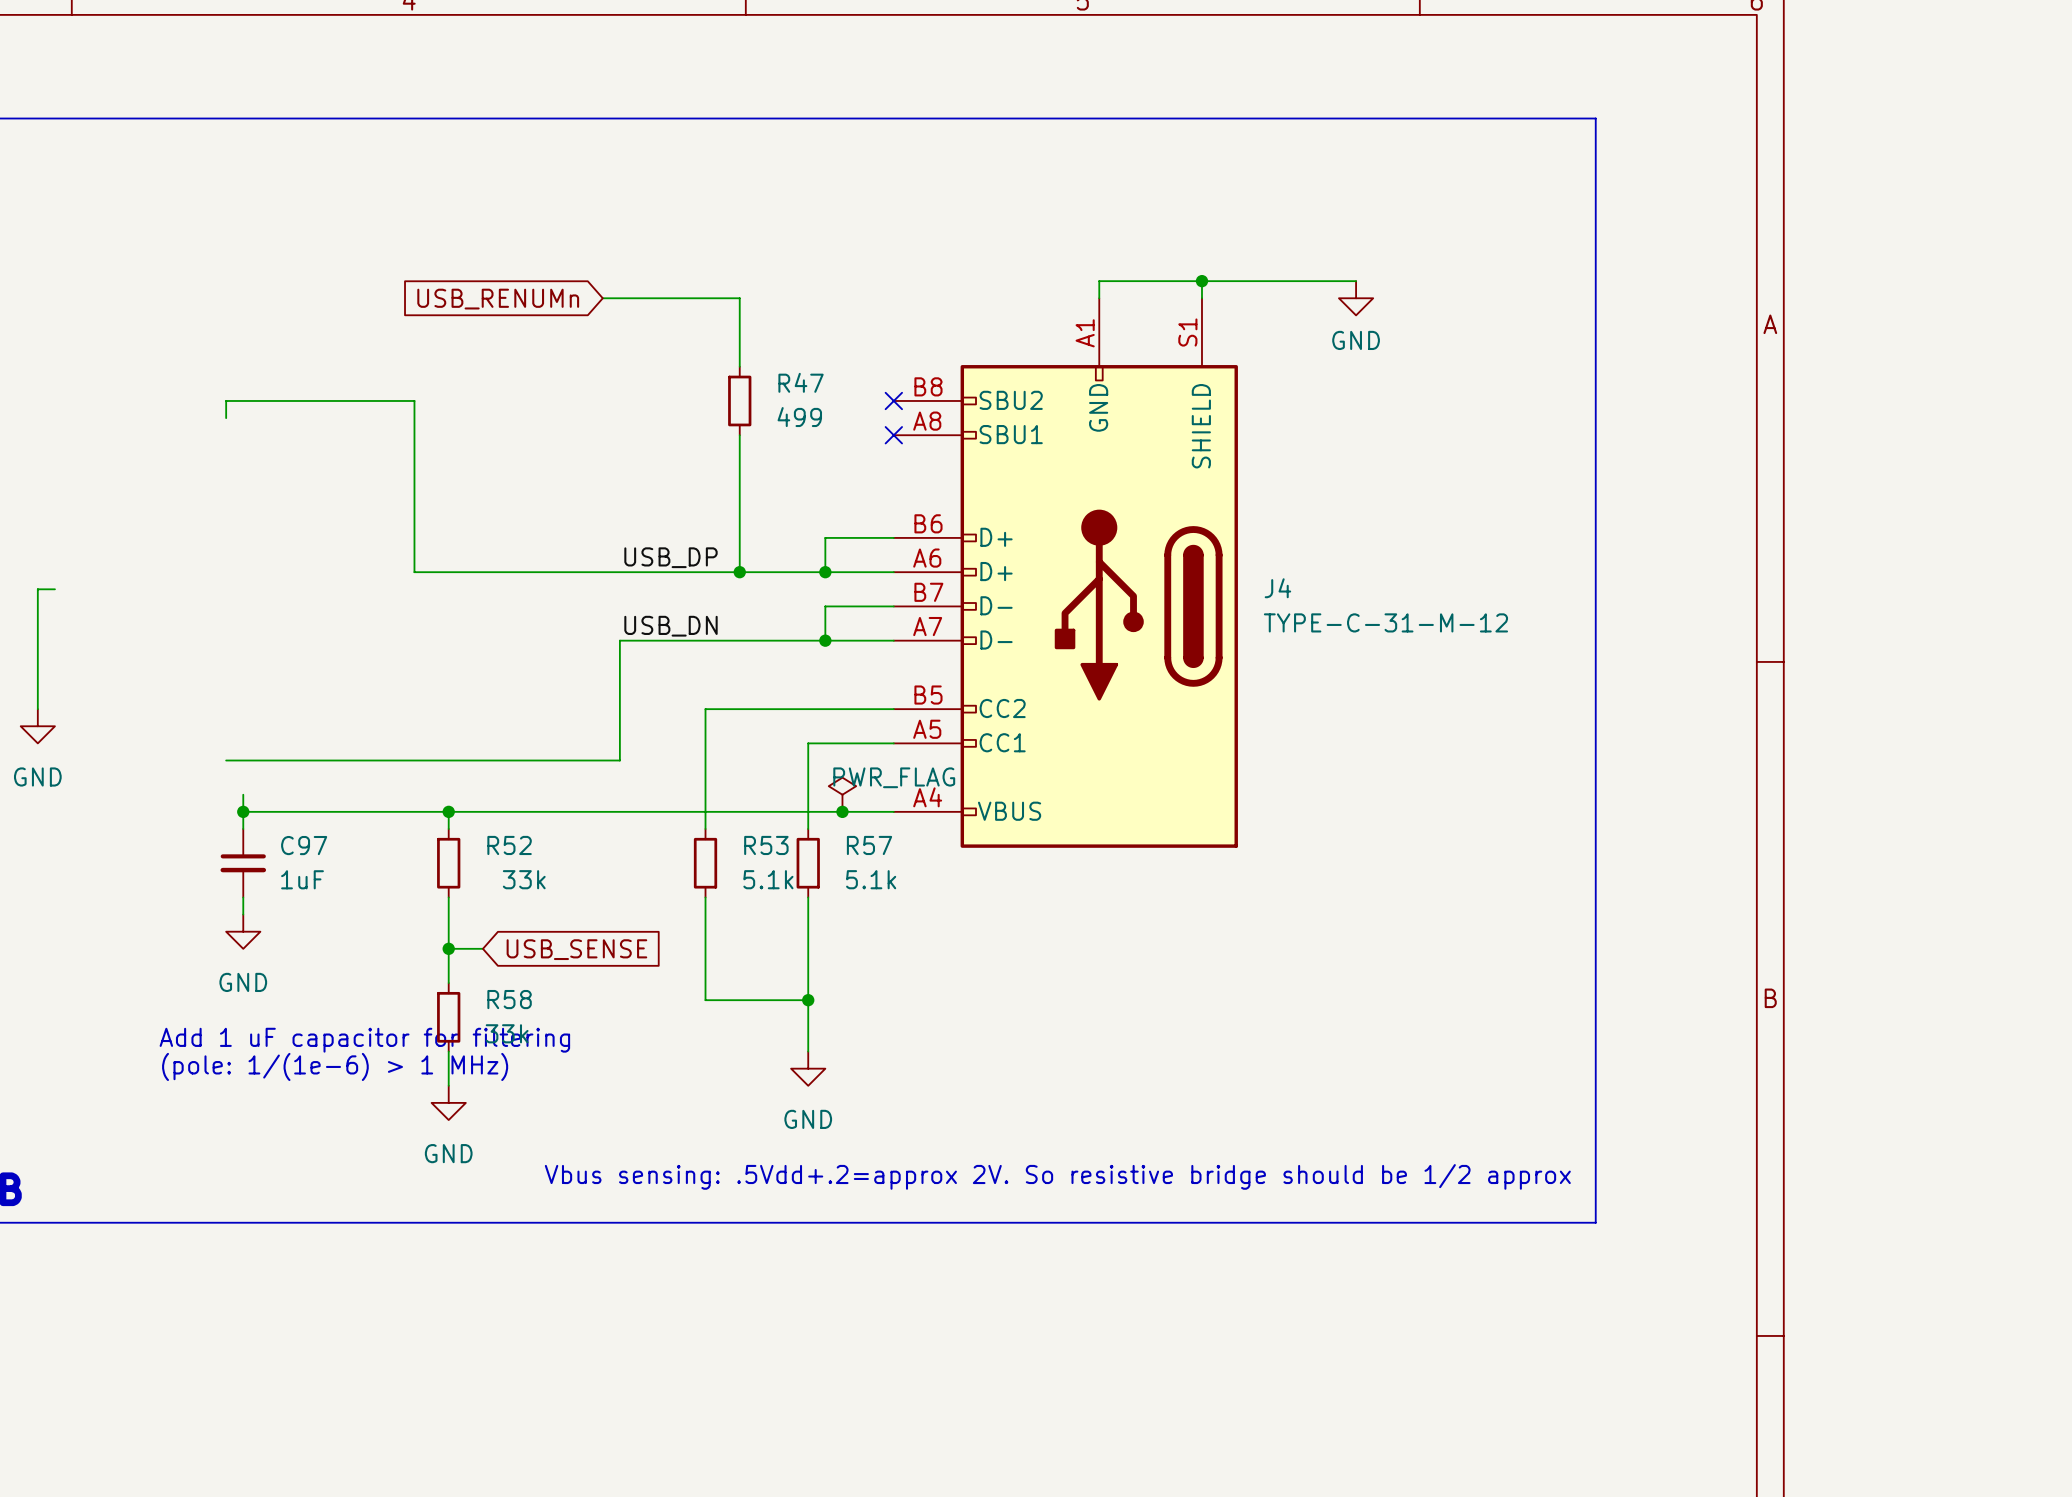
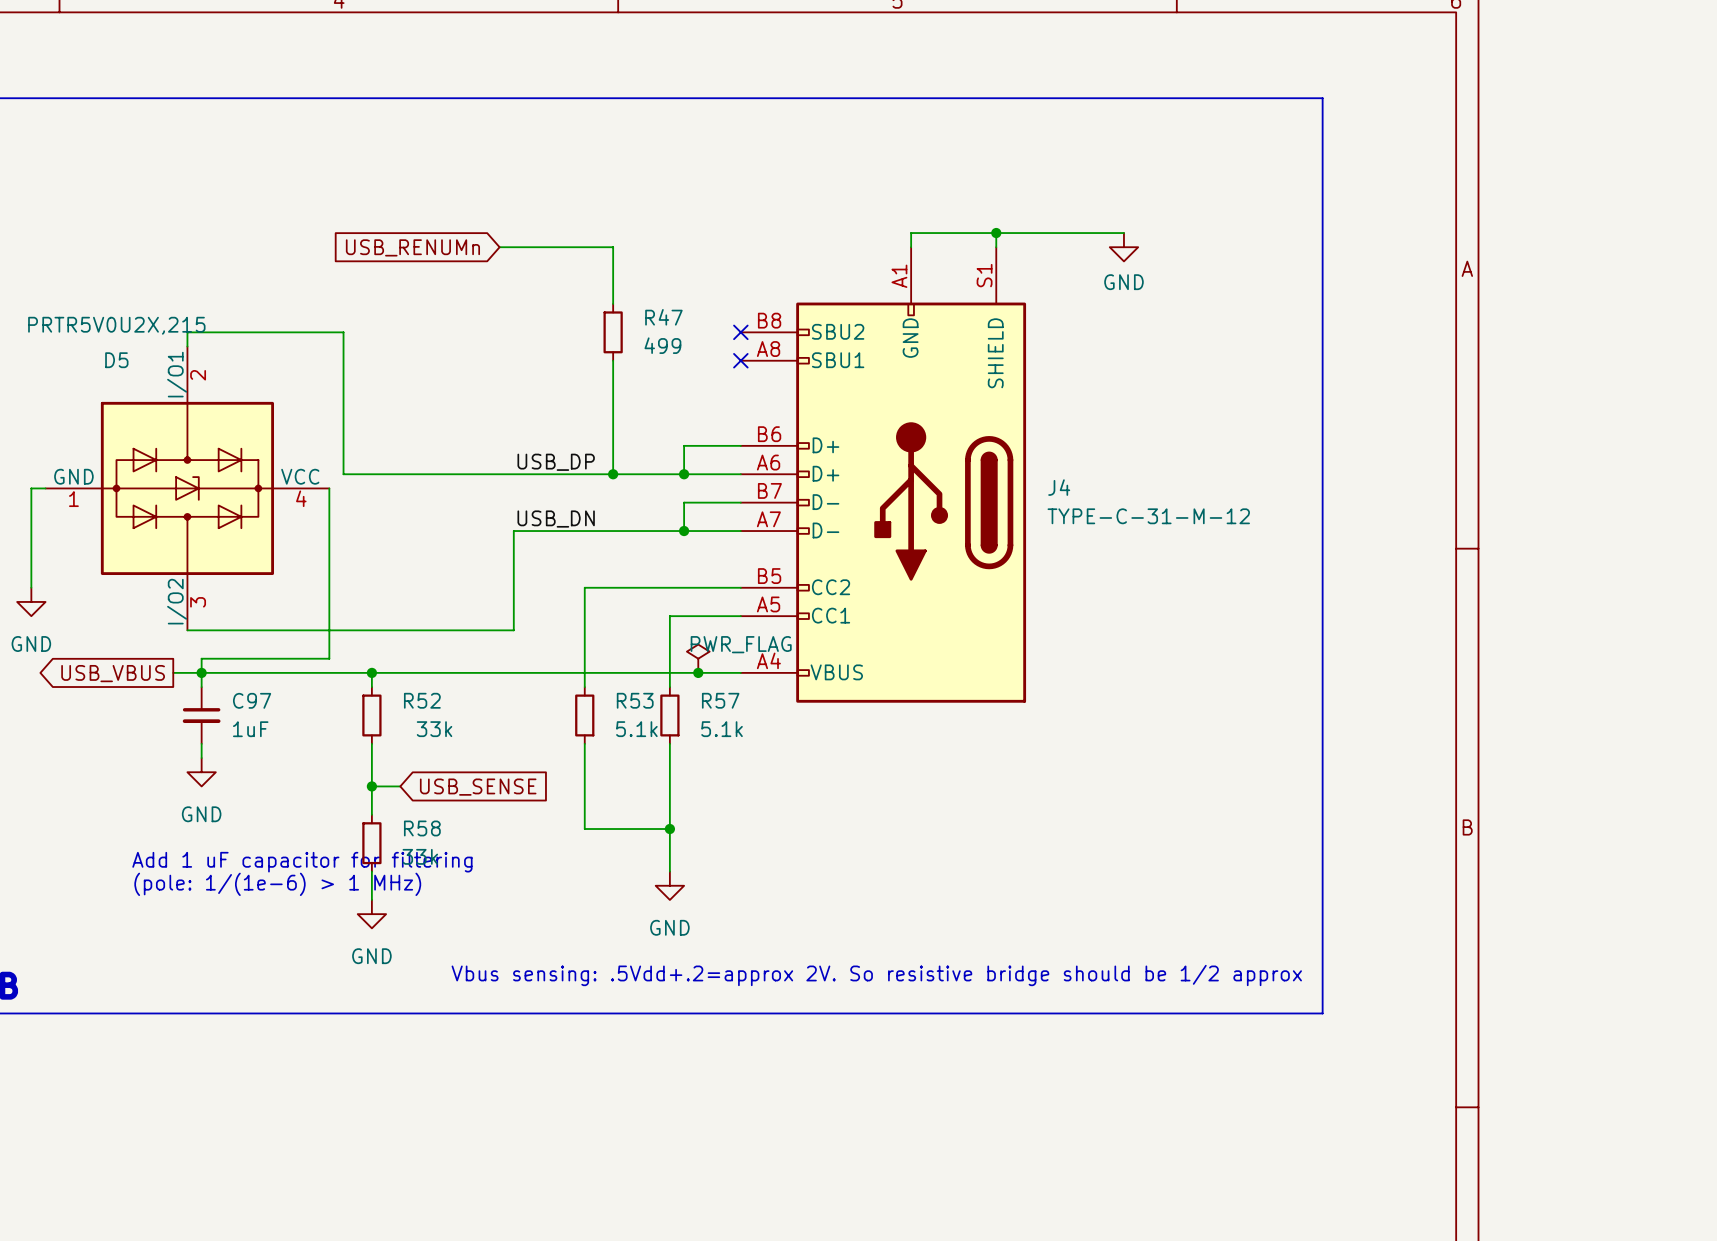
D5: none -> PRTR5V0U2X,215 (187, 488)
wire: none -> (329, 488) (329, 658) (201, 658)
wire: none -> (173, 672) (201, 672)
global label: none -> USB_VBUS (113, 673)

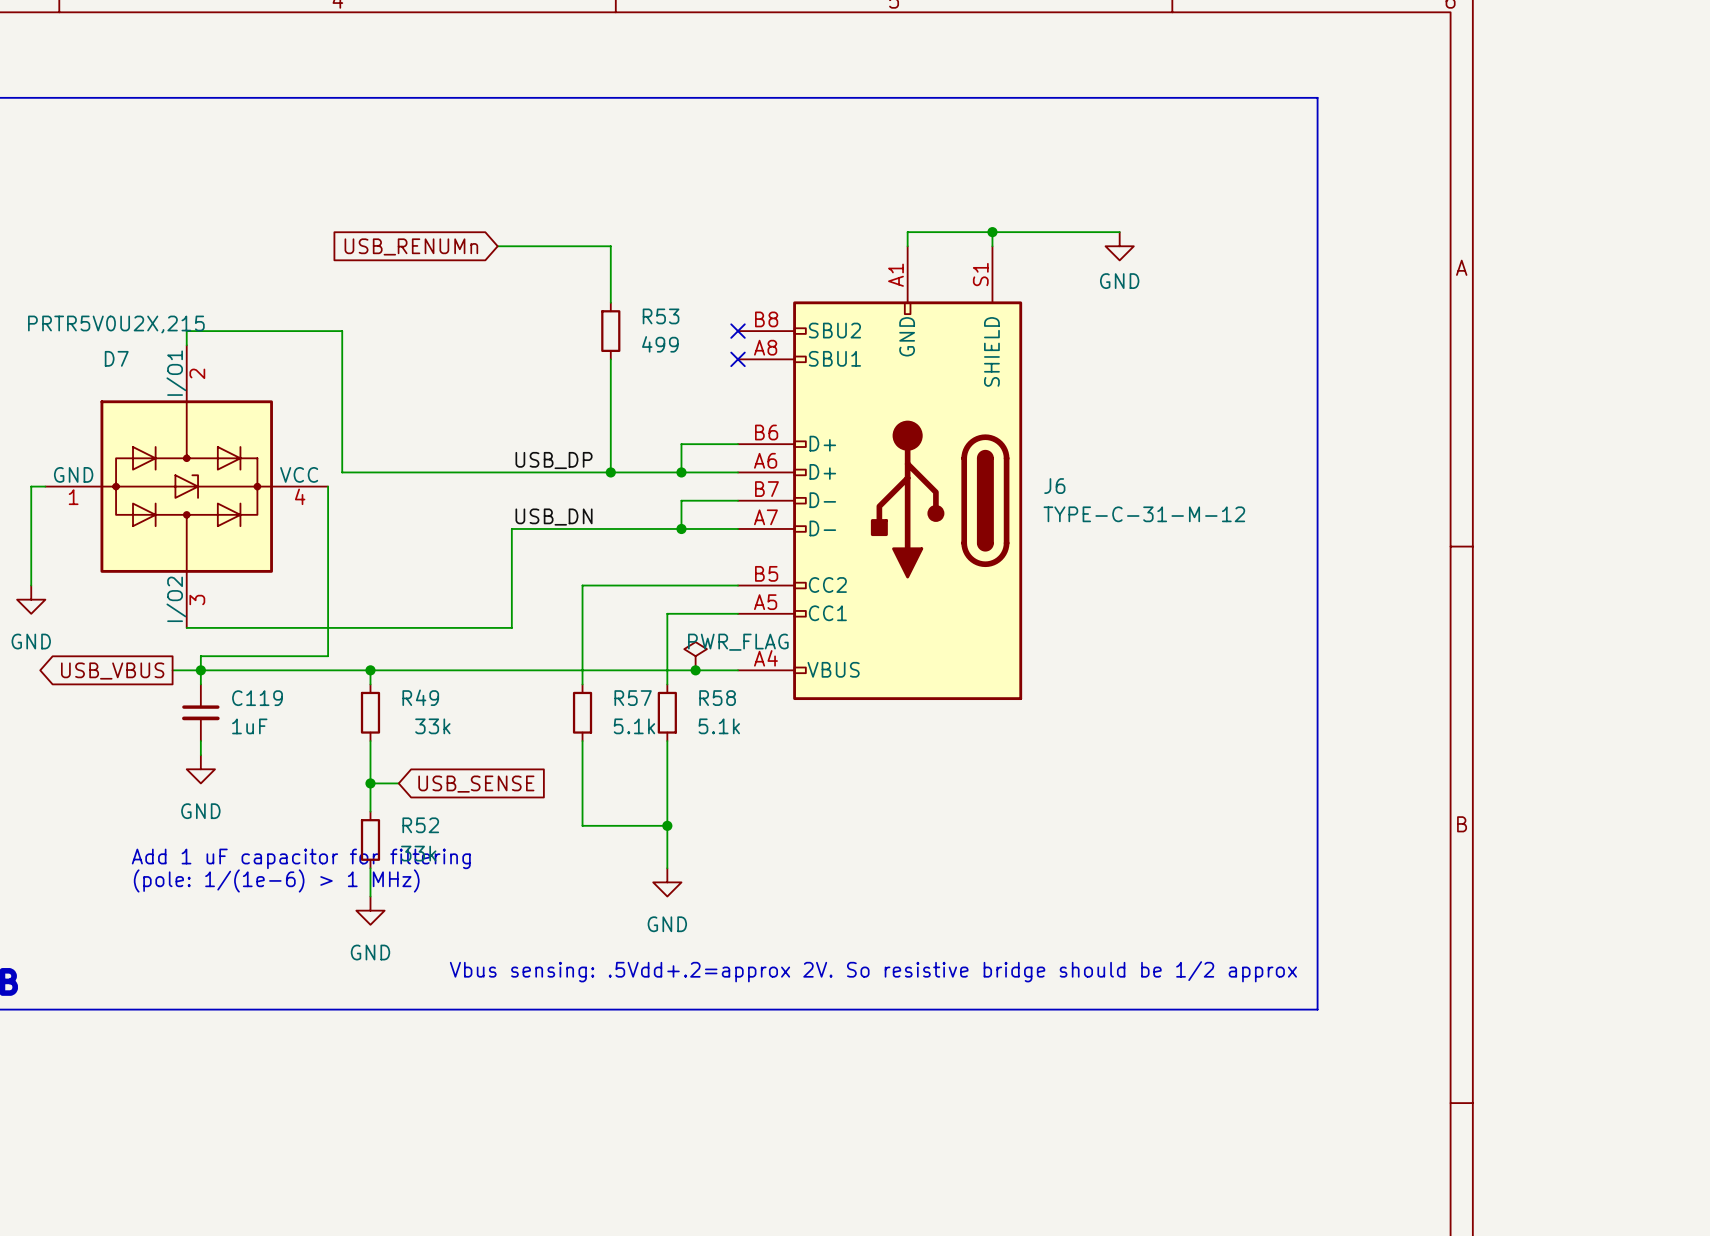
R47 name: R47 (663, 317) -> R53 (661, 316)
D5 name: D5 (116, 360) -> D7 (116, 358)
J4 name: J4 (1059, 487) -> J6 (1054, 486)
C97 name: C97 (252, 700) -> C119 (257, 698)
R52 name: R52 (422, 700) -> R49 (420, 697)
R53 name: R53 (635, 700) -> R57 (633, 698)
R57 name: R57 (720, 700) -> R58 (717, 698)
R58 name: R58 (422, 828) -> R52 (420, 825)

